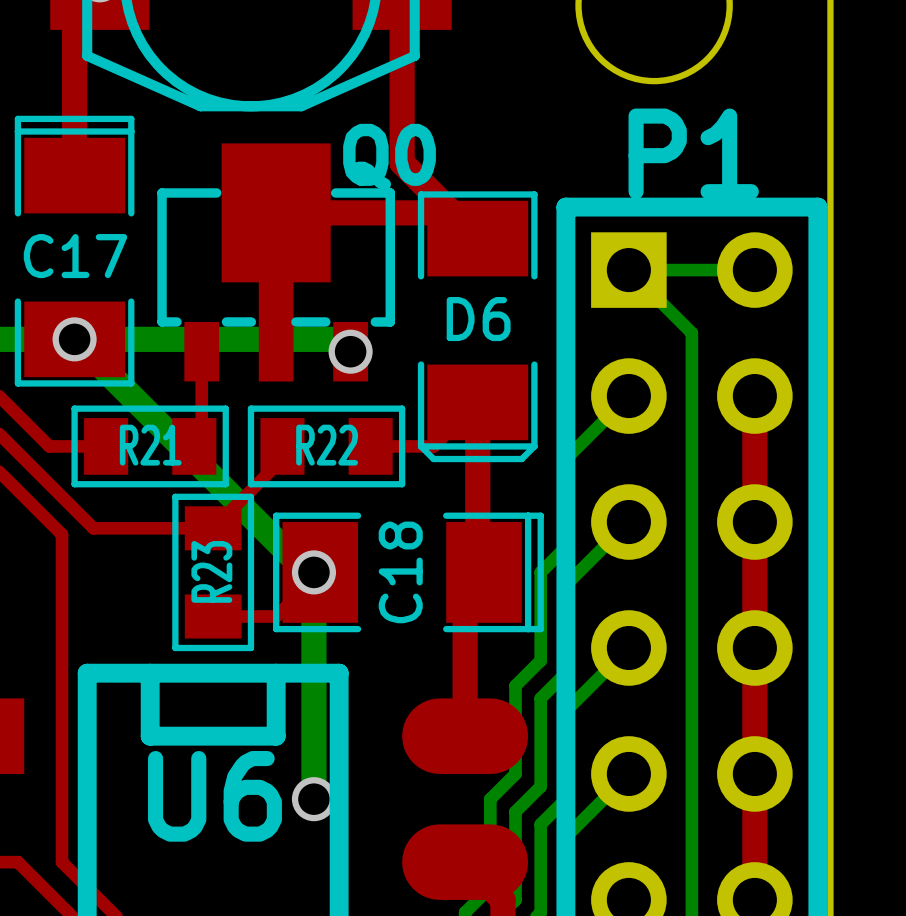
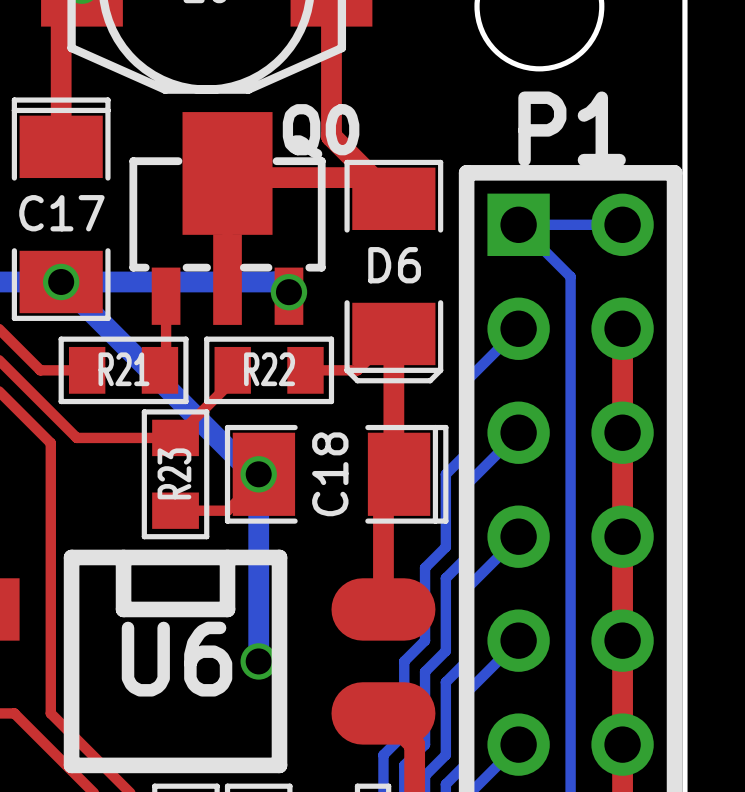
Q0 footprint: [157, 143, 396, 382] -> [129, 112, 326, 325]

